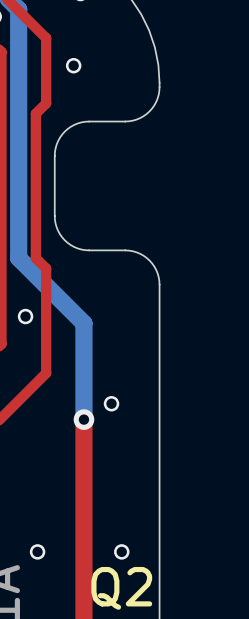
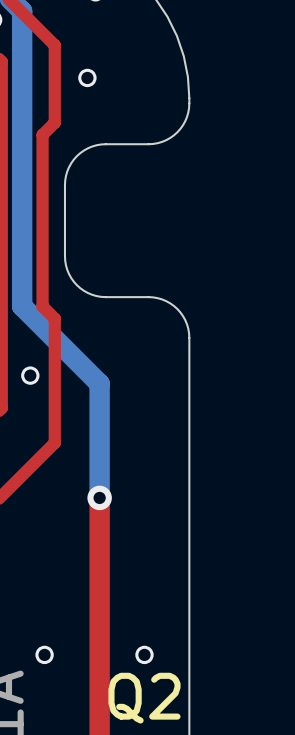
via: (111, 403) -> none

